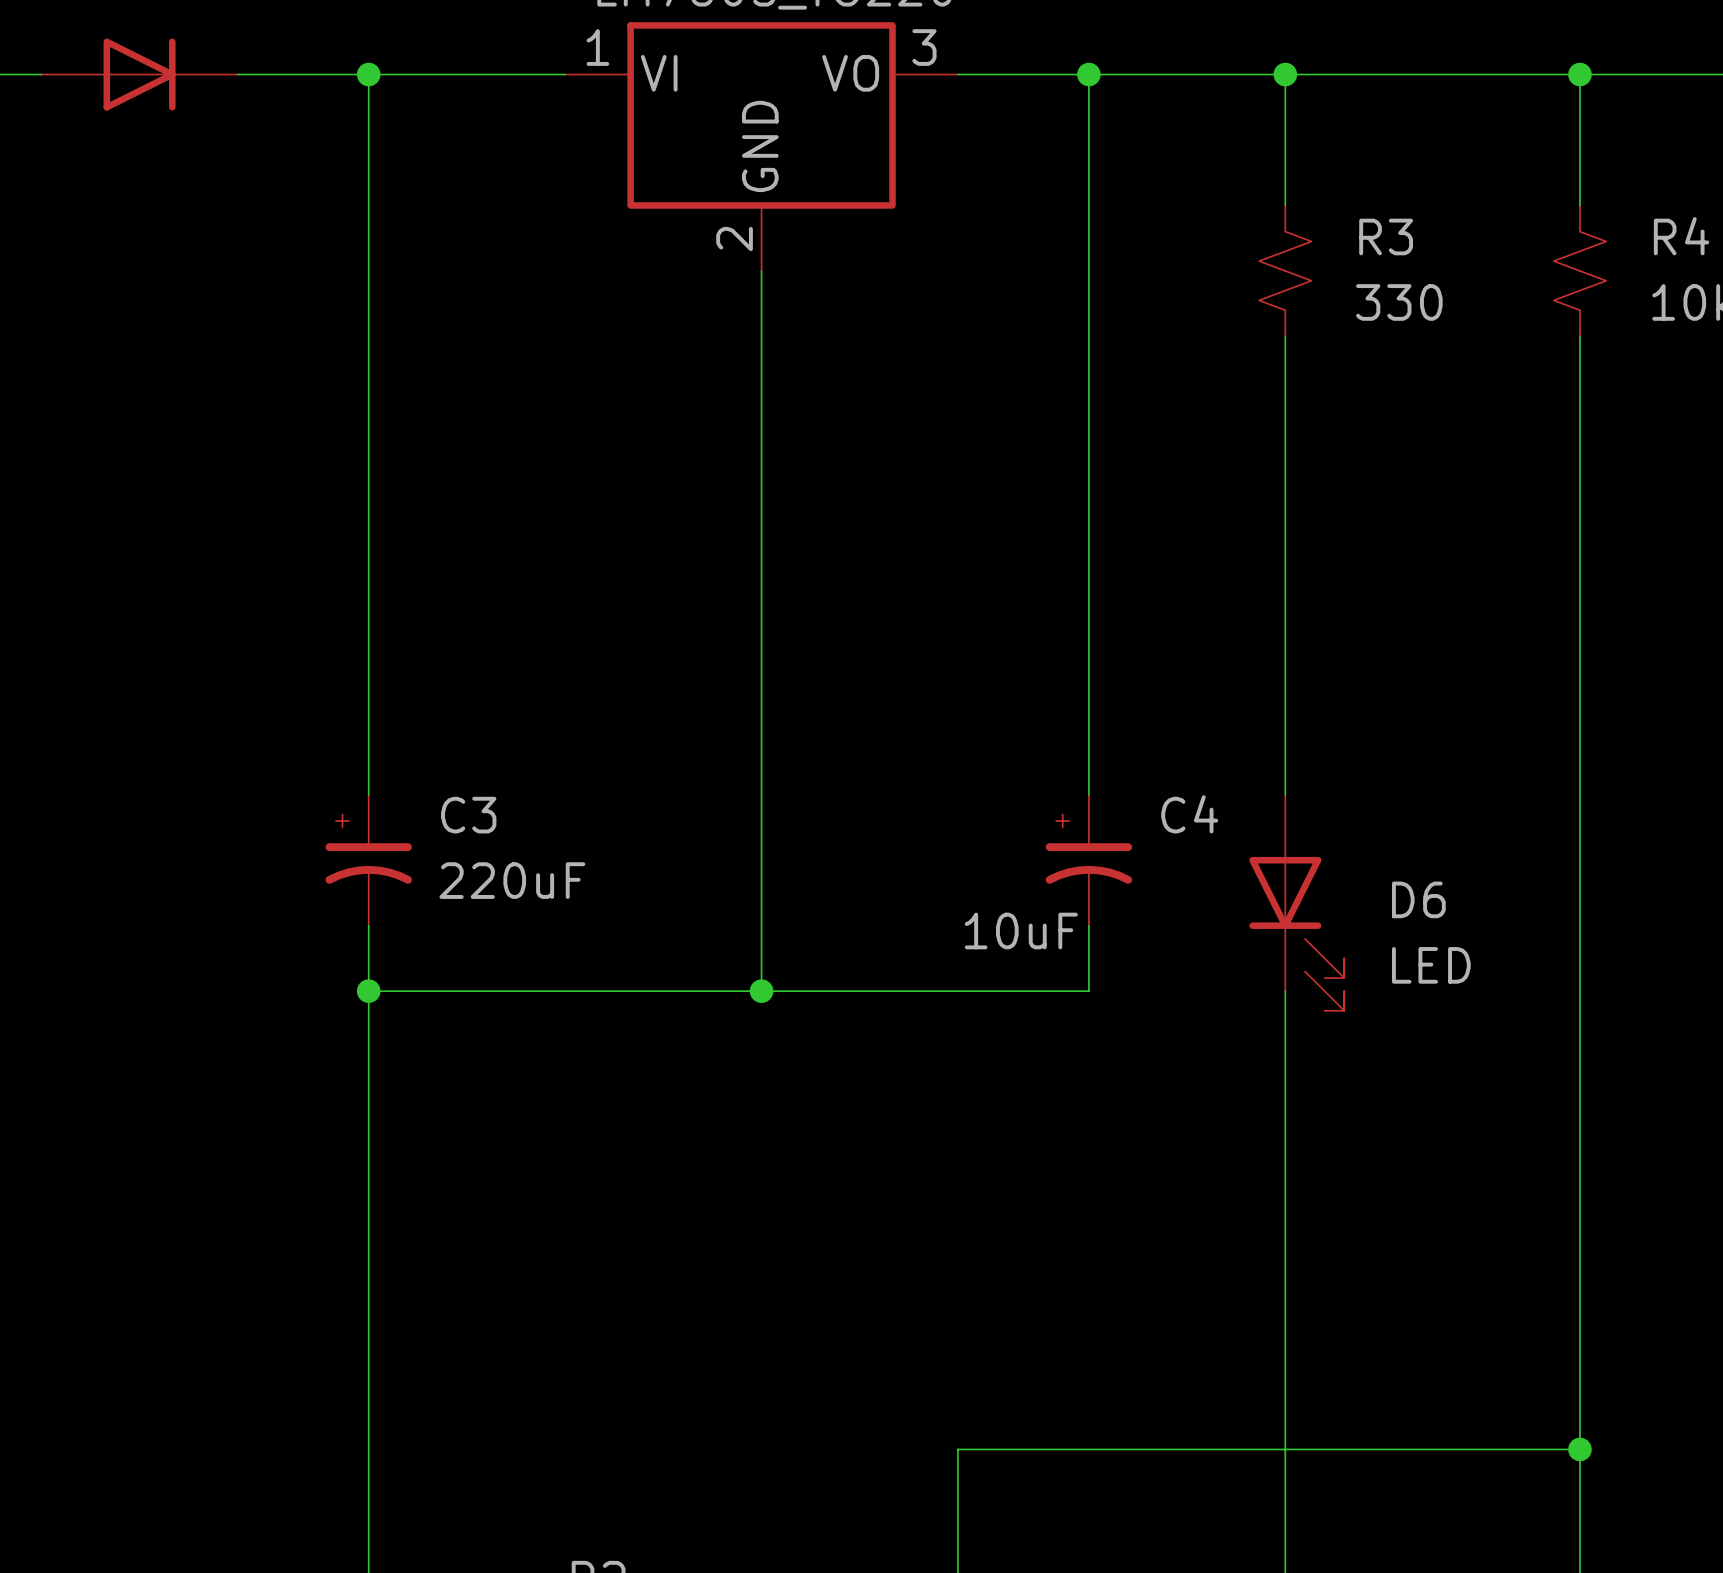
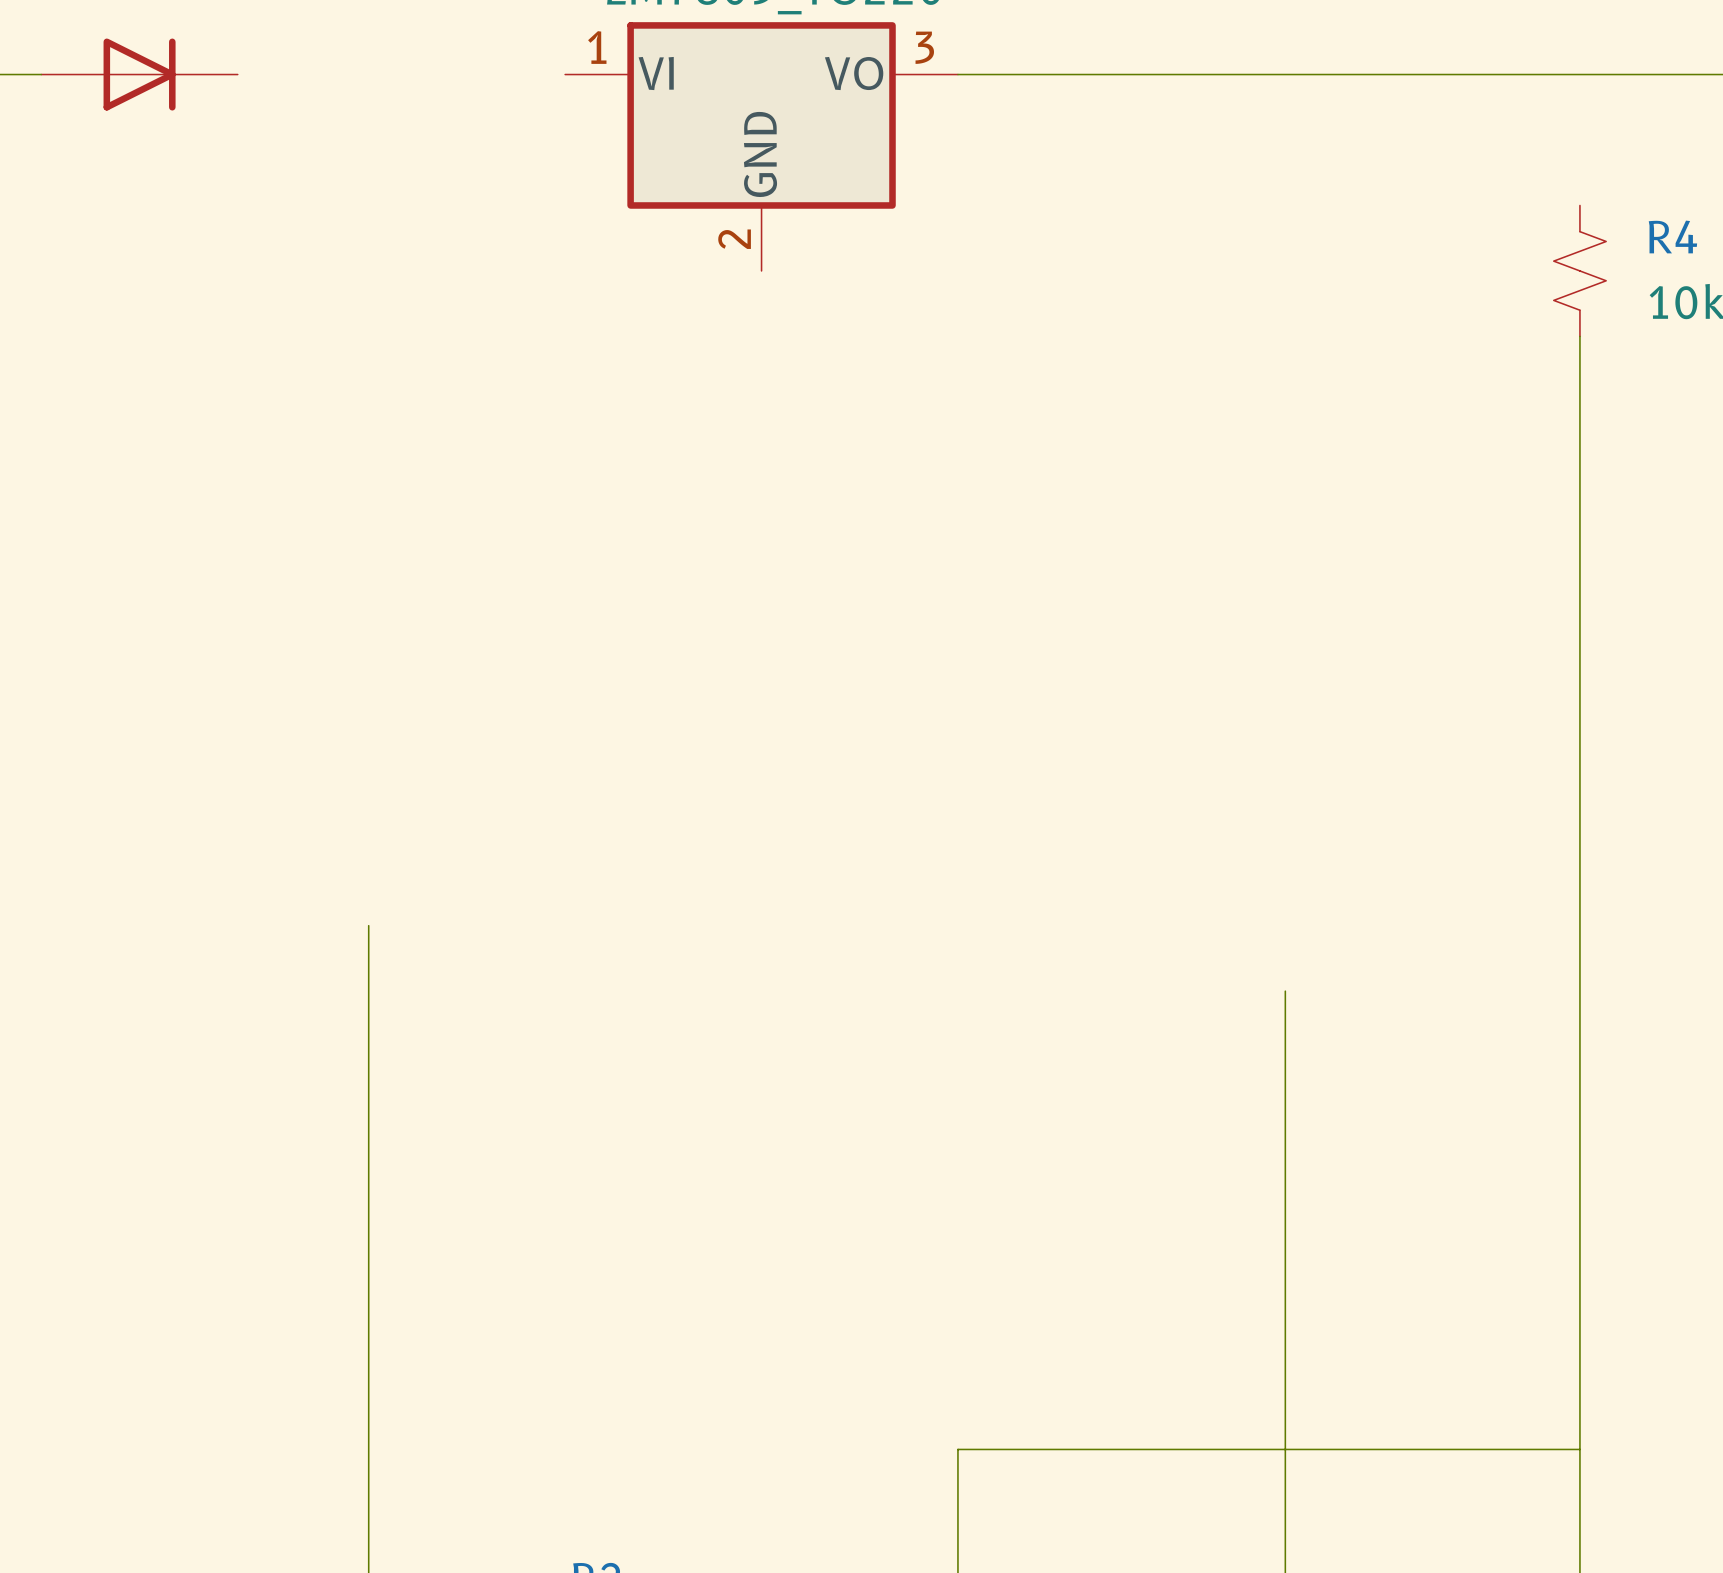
wire: (237, 74) (565, 74) -> none
wire: (368, 74) (368, 794) -> none
junction: (368, 74) -> none
wire: (1088, 74) (1088, 794) -> none
junction: (1088, 74) -> none
wire: (1285, 74) (1285, 205) -> none
junction: (1285, 74) -> none
wire: (1579, 74) (1579, 205) -> none
junction: (1579, 74) -> none
wire: (761, 270) (761, 991) -> none
R3: 330 (1285, 270) -> none
wire: (1285, 336) (1285, 794) -> none
C3: 220uF (368, 860) -> none
C4: 10uF (1088, 860) -> none
D6: LED (1296, 902) -> none
wire: (1088, 925) (1088, 991) (368, 991) -> none
junction: (368, 991) -> none
junction: (761, 991) -> none
junction: (1579, 1449) -> none

